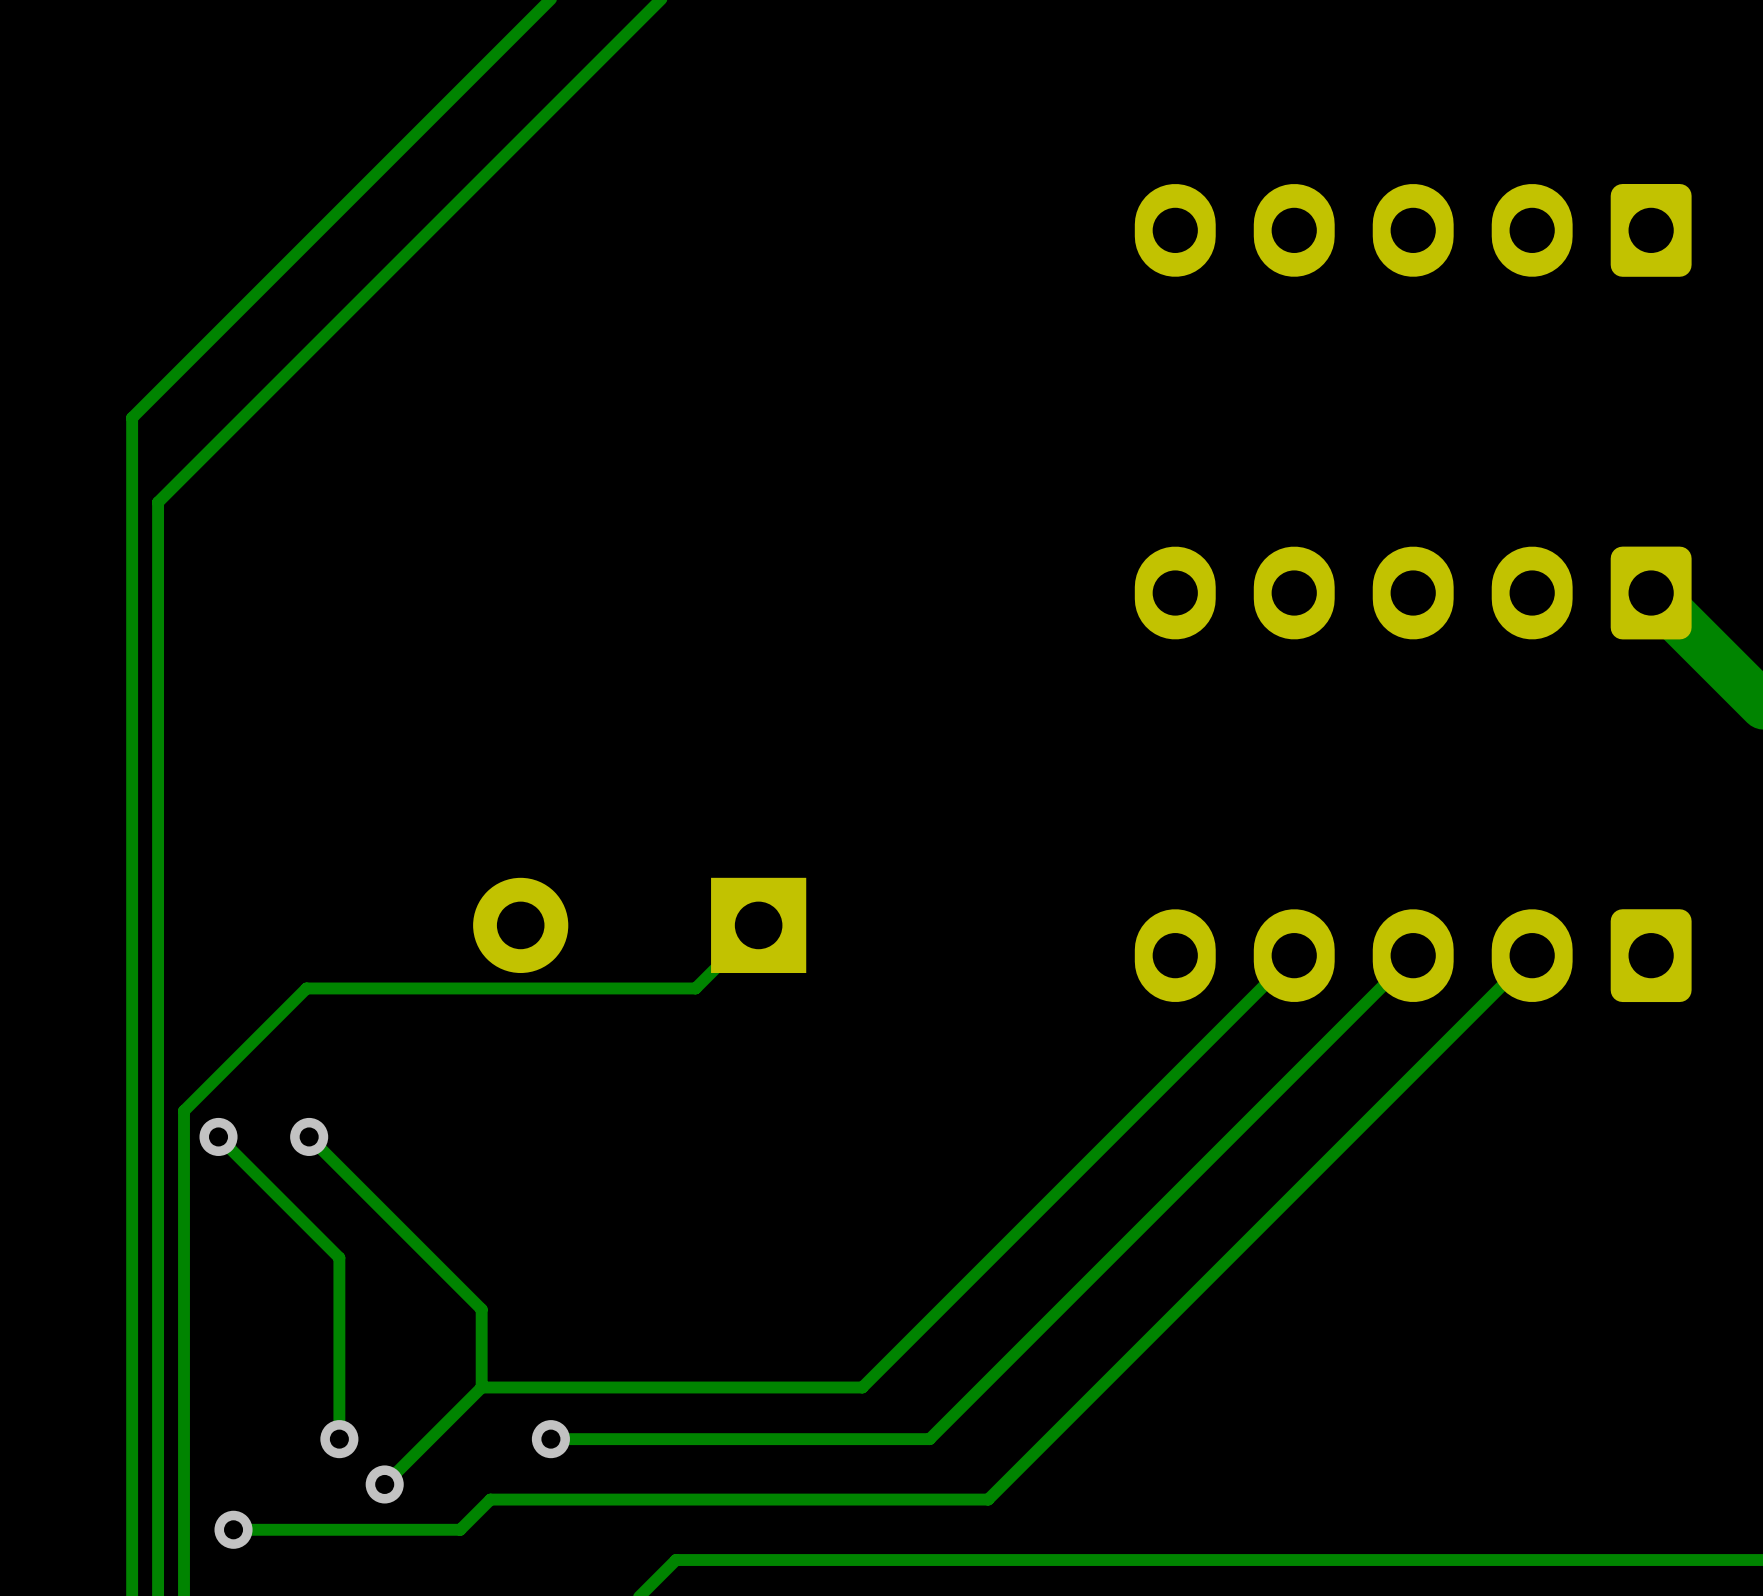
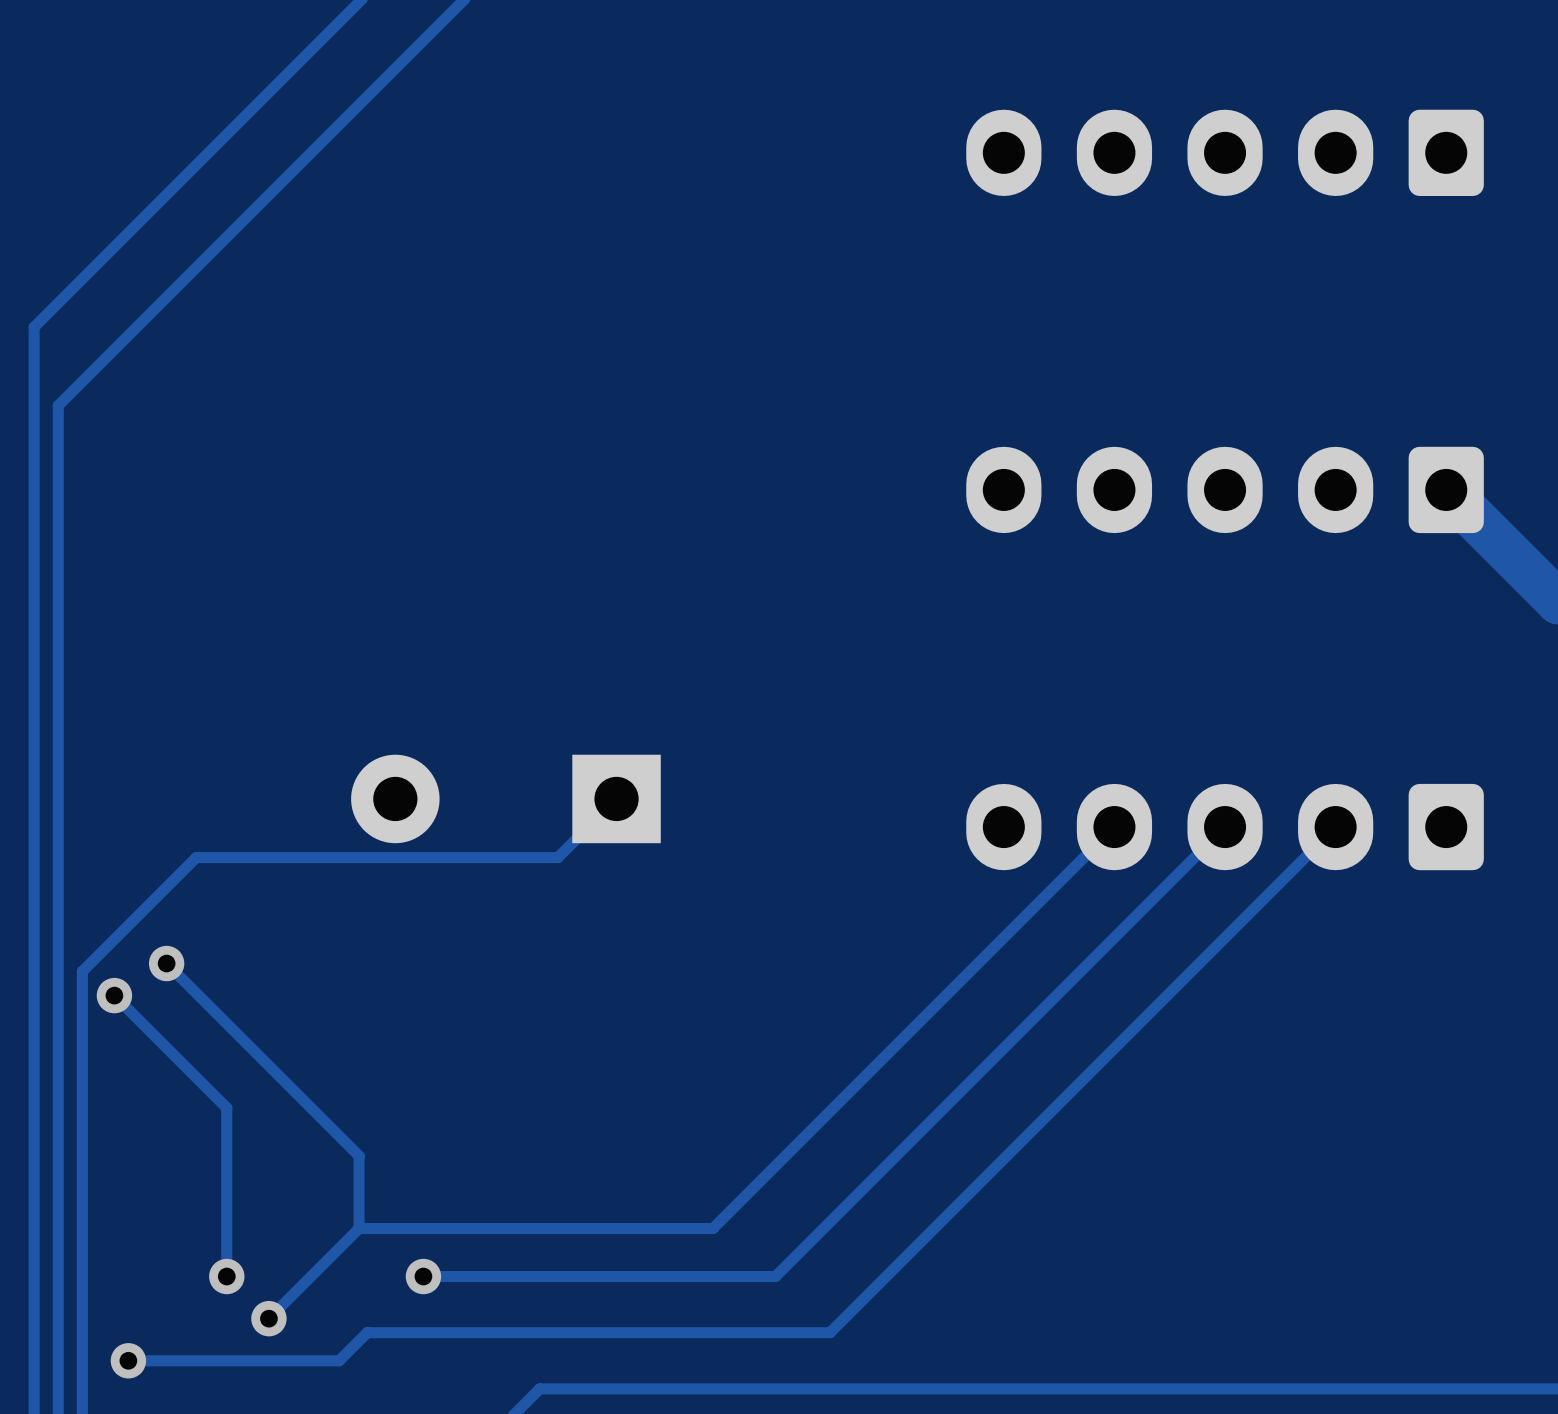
track: none -> (166, 963) (198, 995)
via position: (309, 1136) -> (166, 963)

